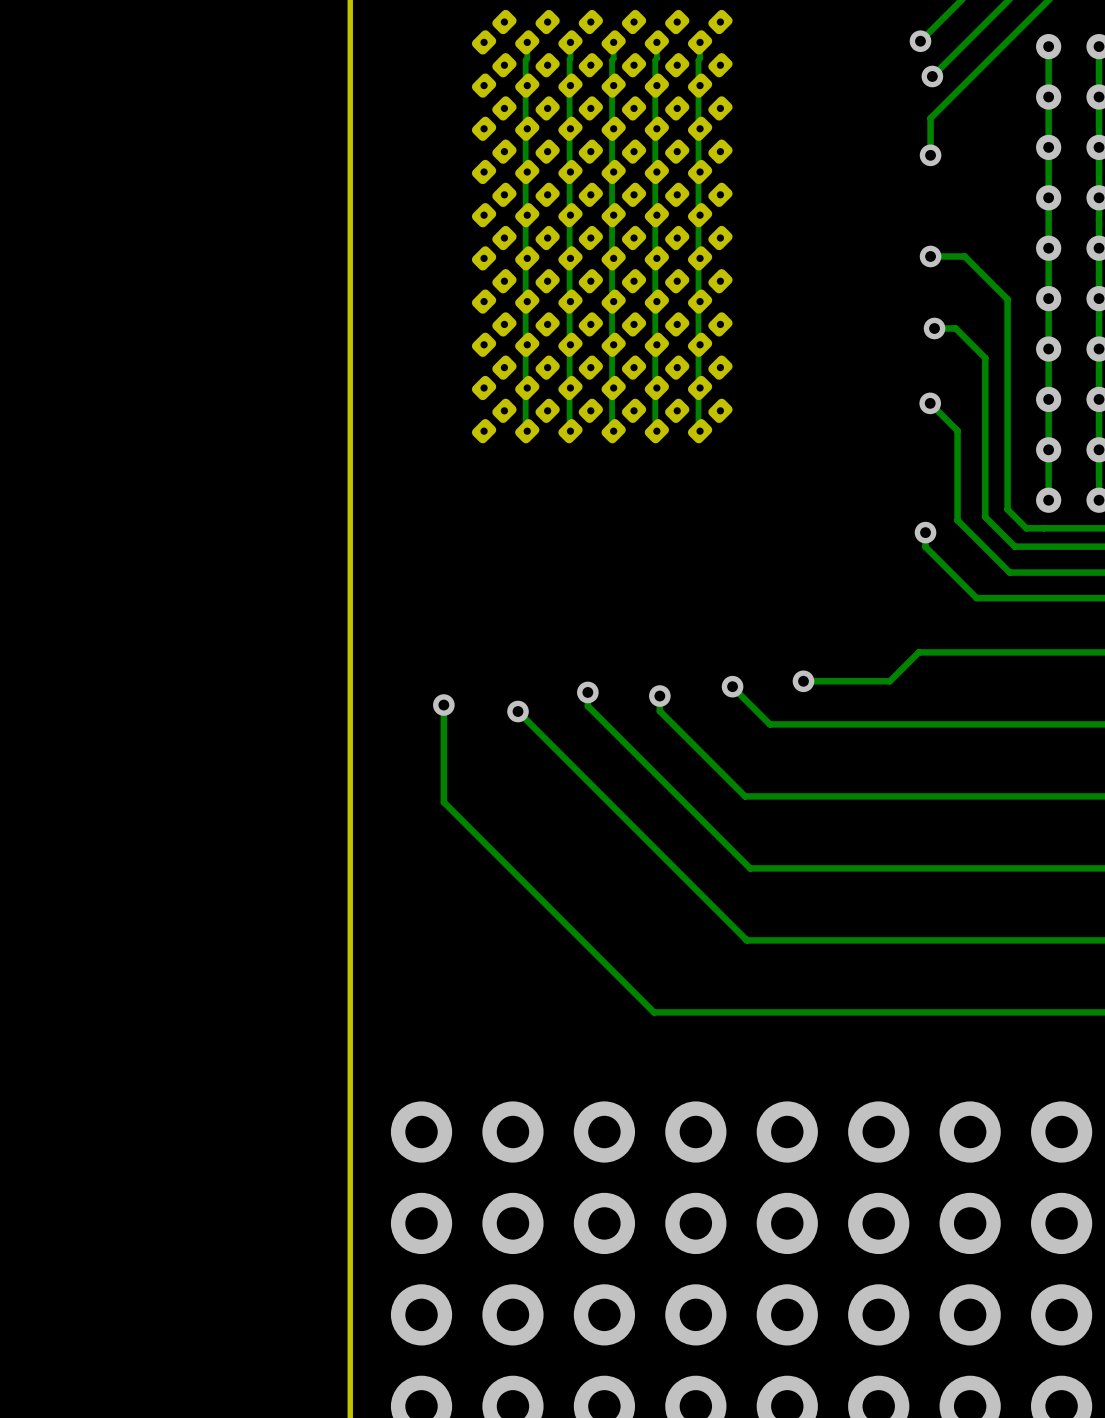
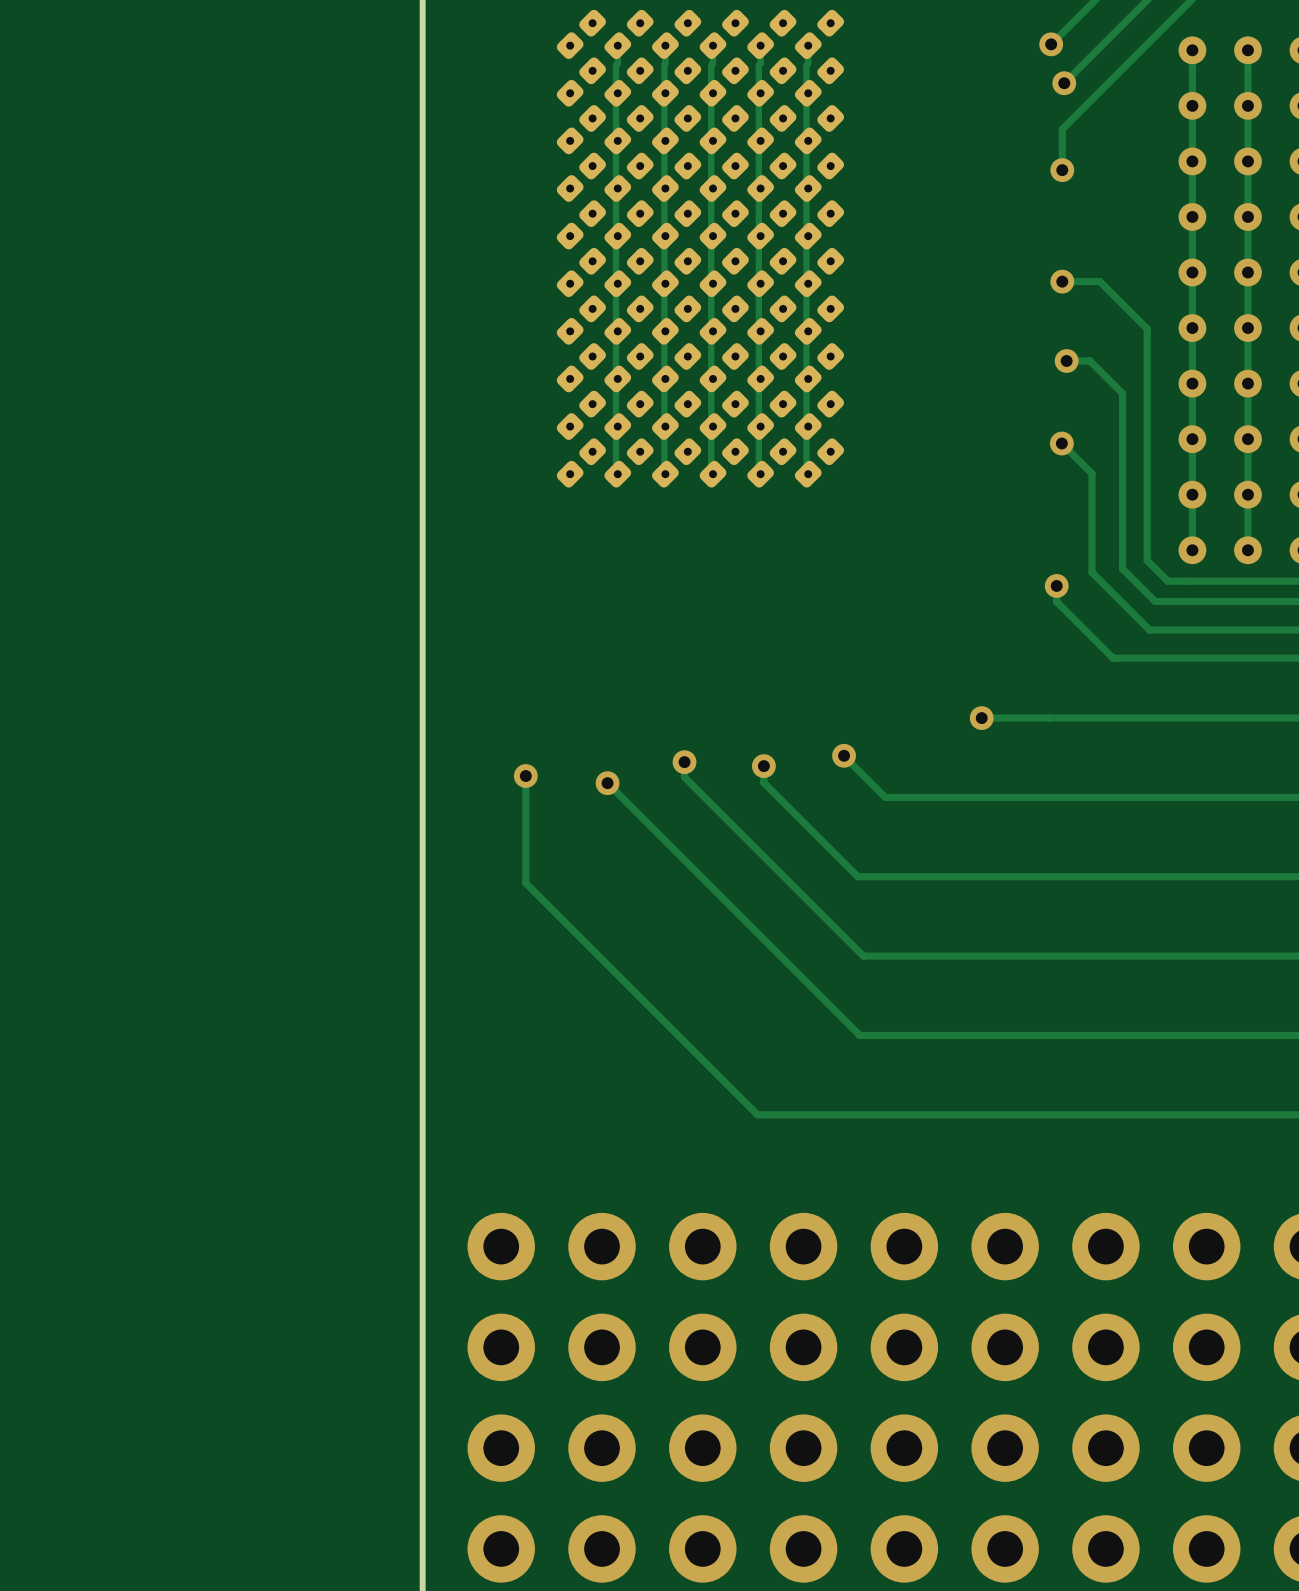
track: (918, 652) (889, 681) (803, 681) -> (1049, 718) (981, 718)
via position: (803, 681) -> (981, 718)

